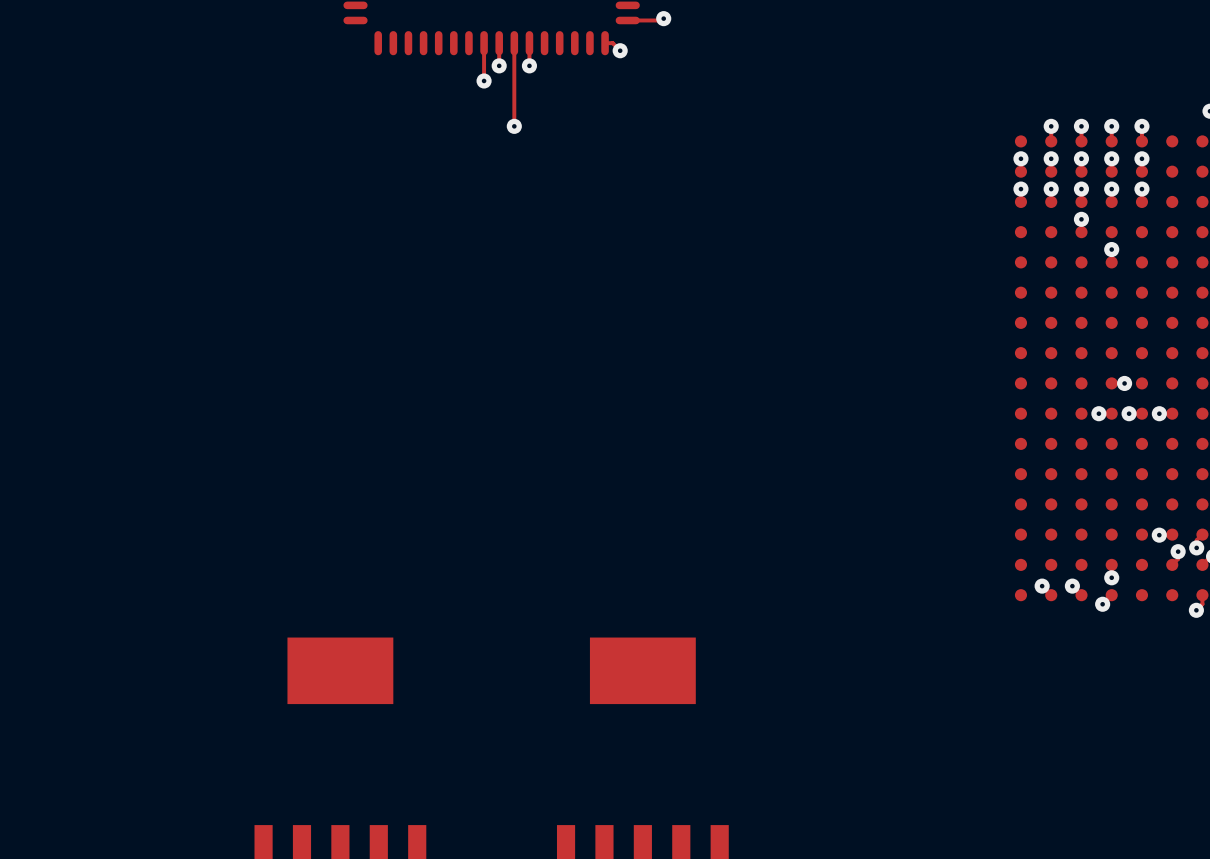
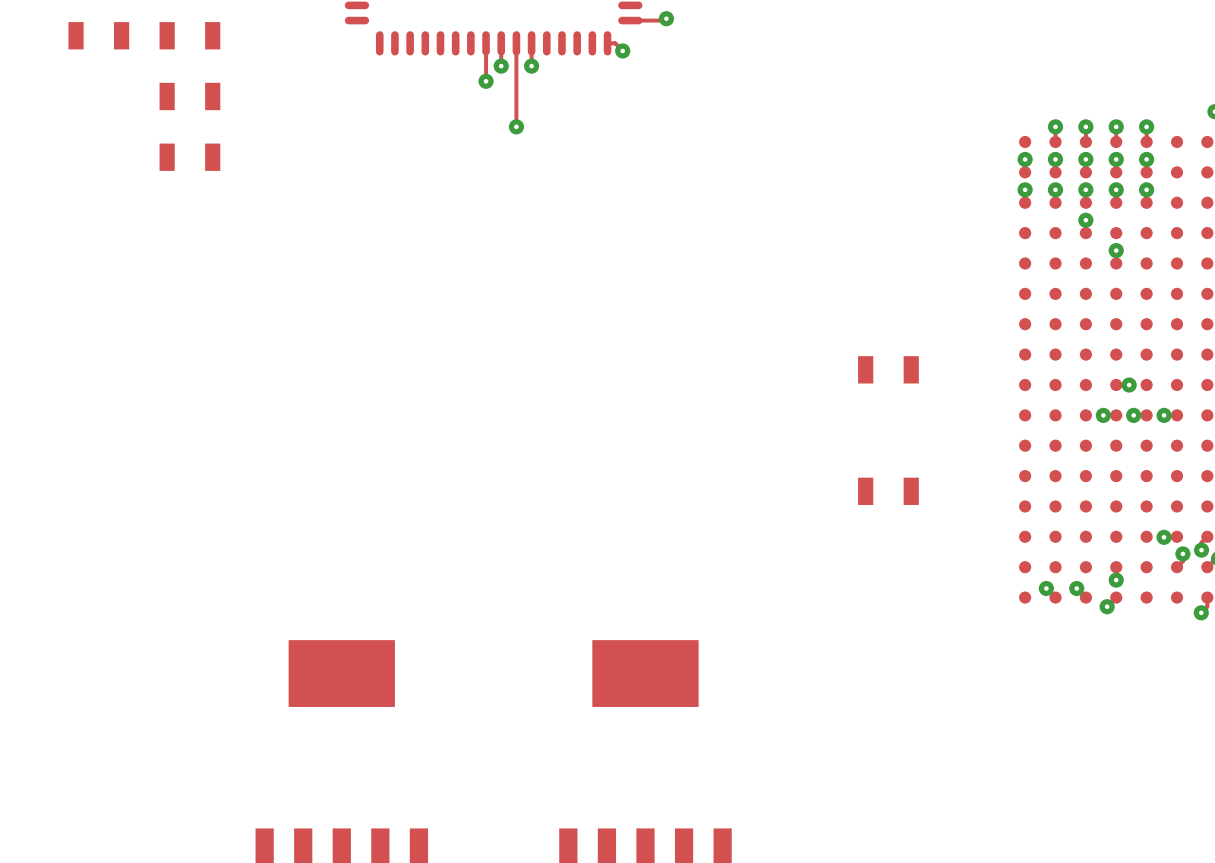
part: none -> (98, 35)
part: none -> (189, 35)
part: none -> (189, 96)
part: none -> (189, 157)
part: none -> (888, 369)
part: none -> (888, 491)

